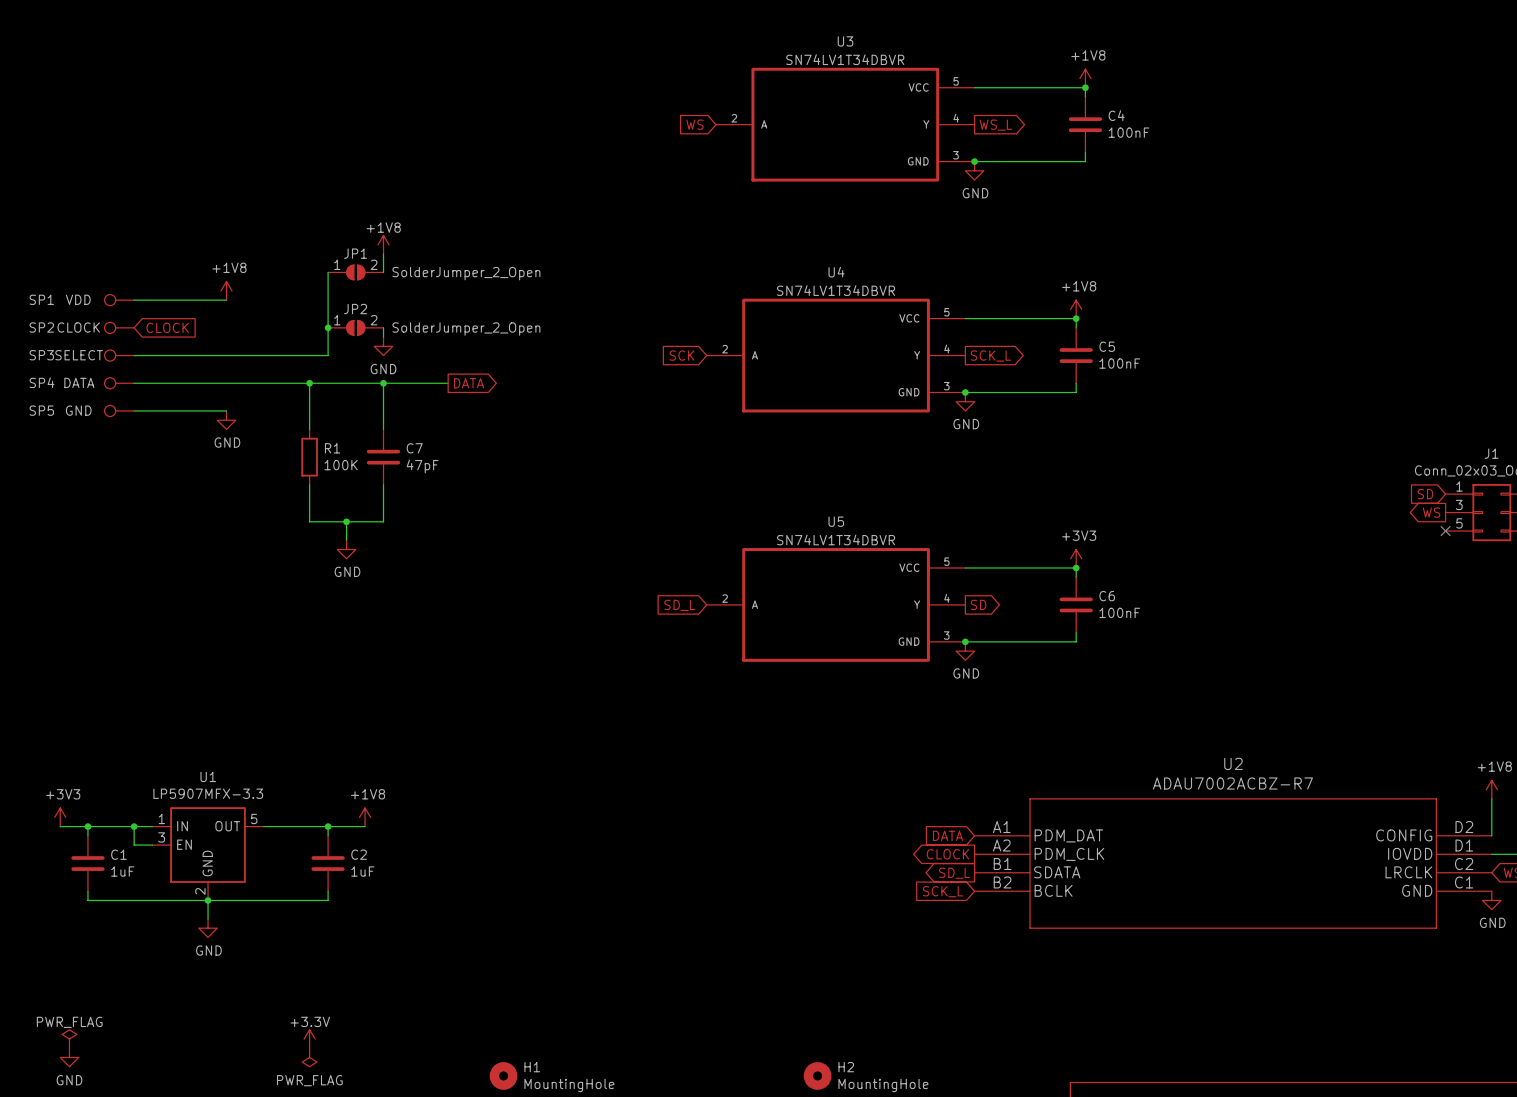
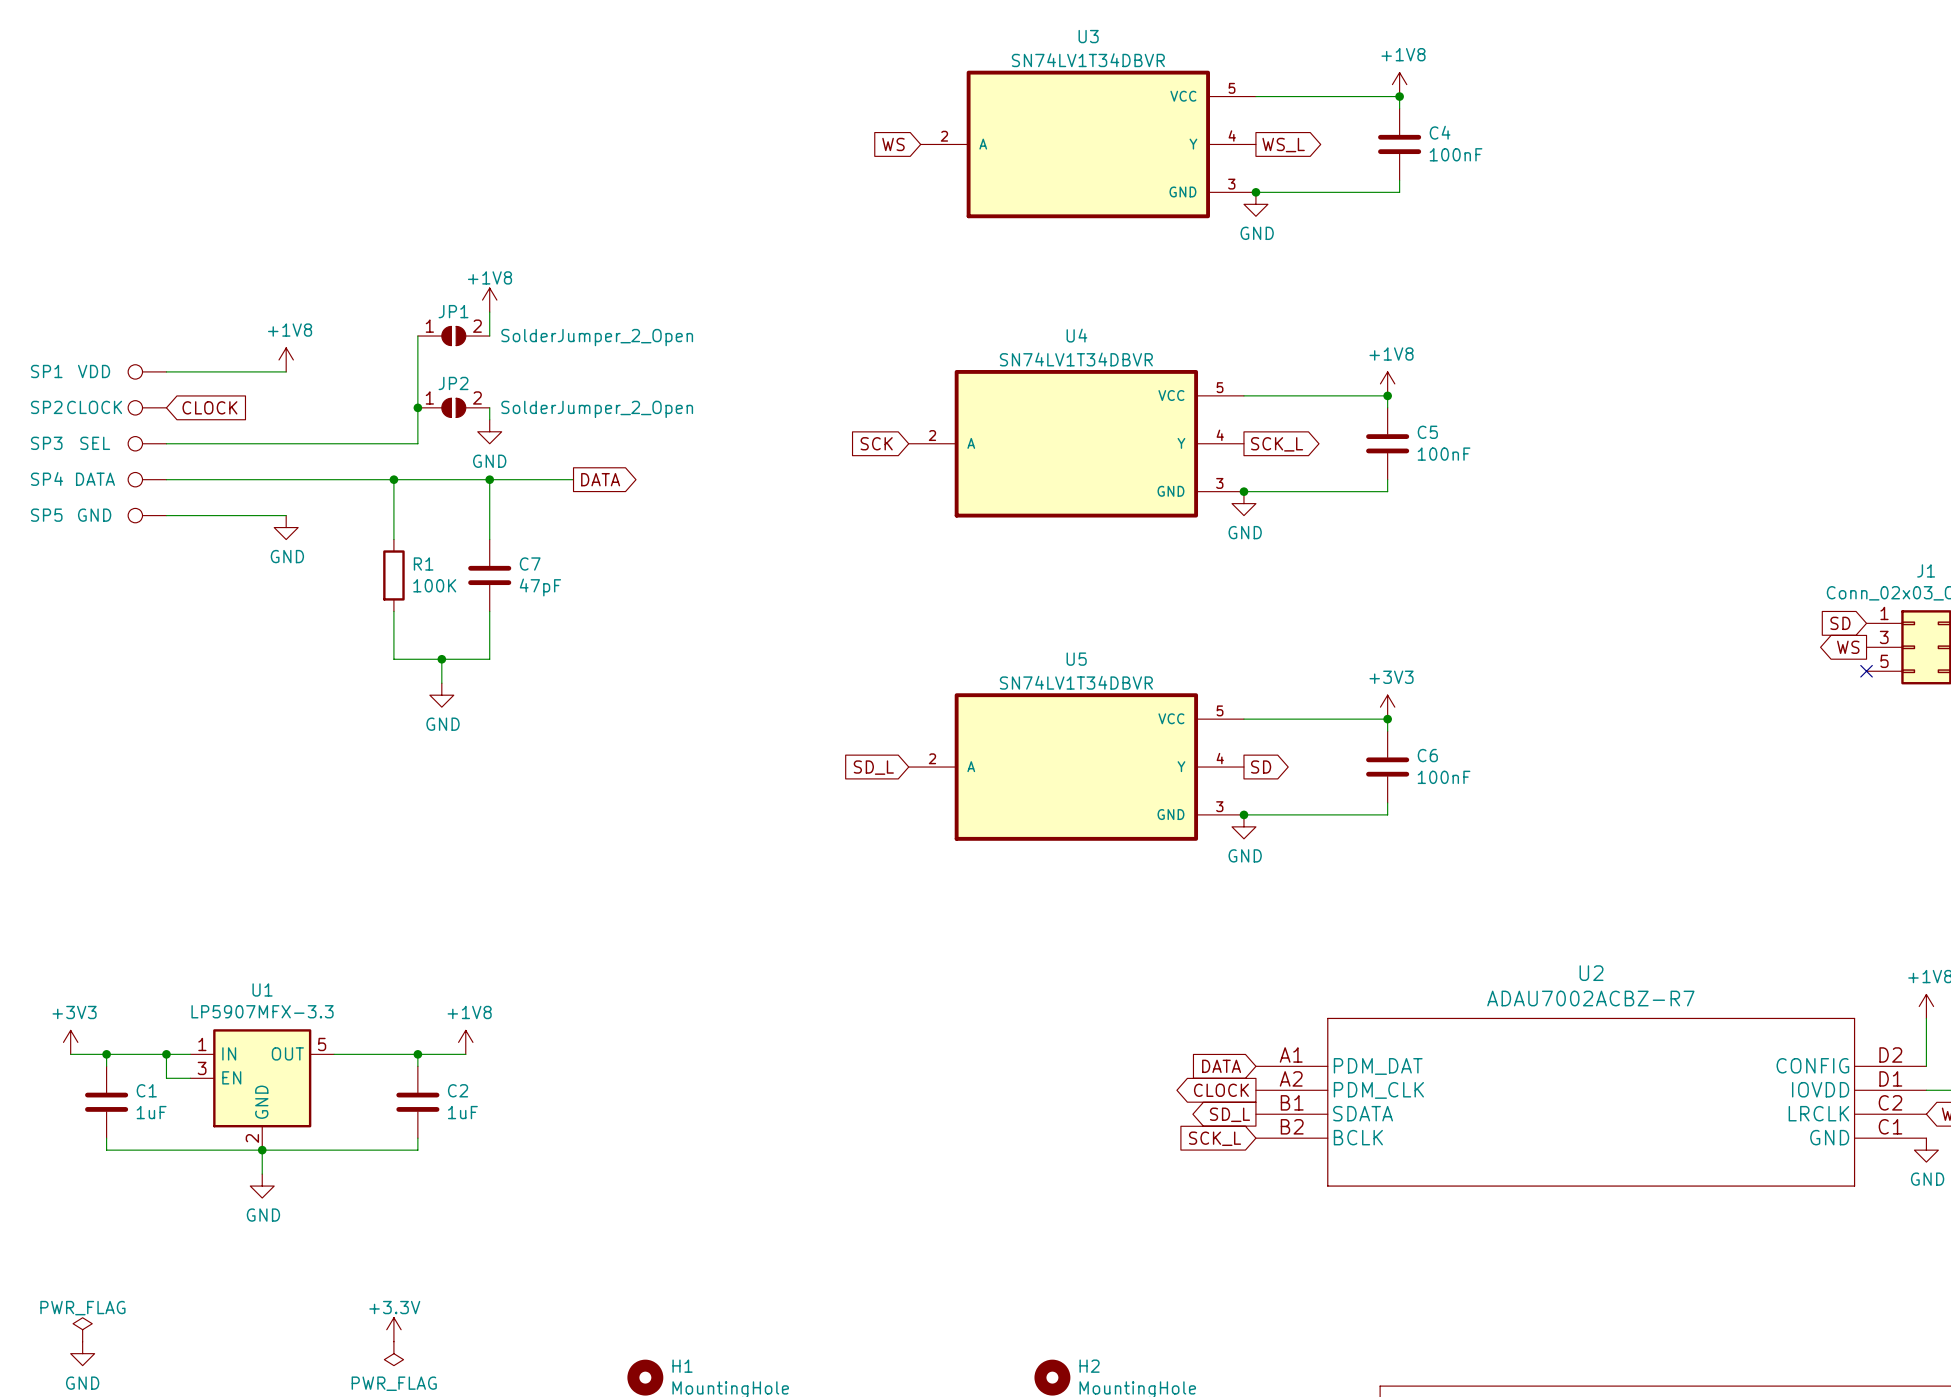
SP3 value: SELECT (79, 355) -> SEL (95, 443)

